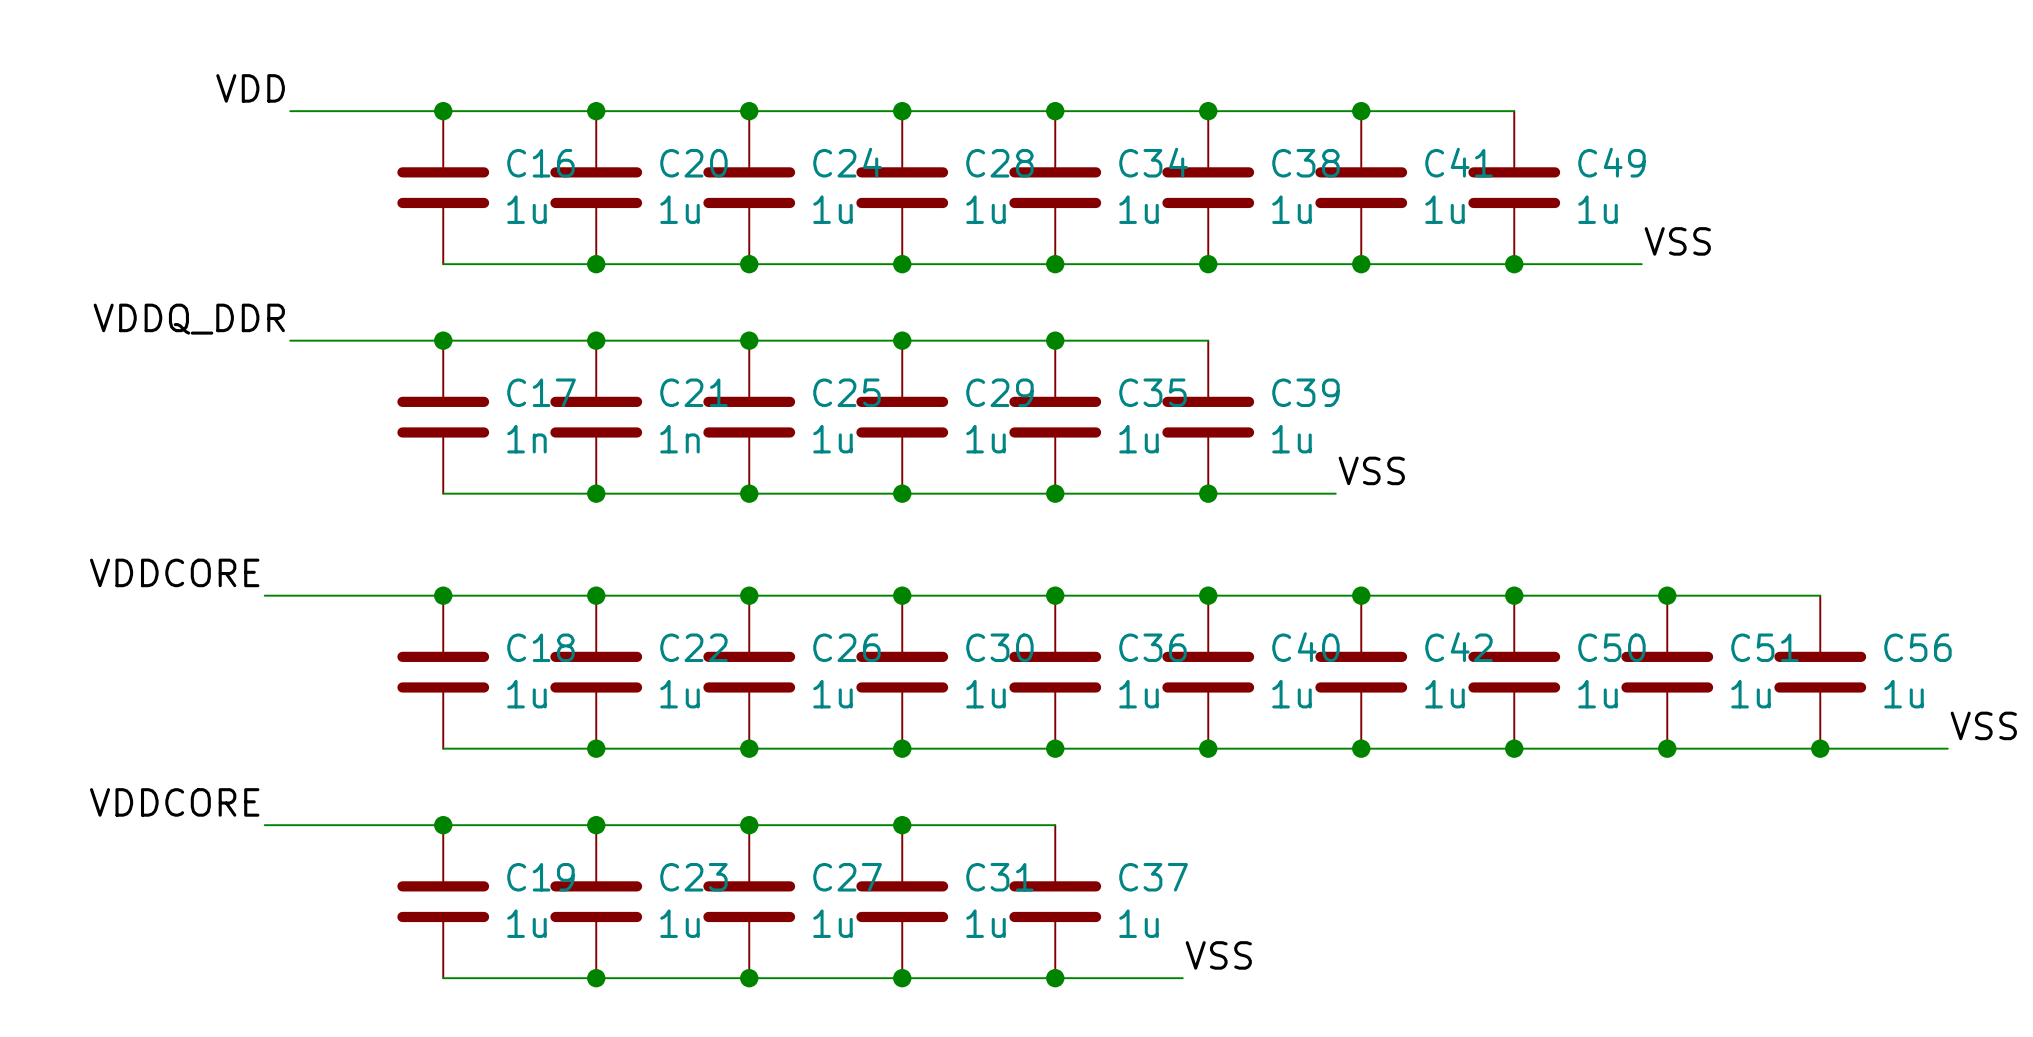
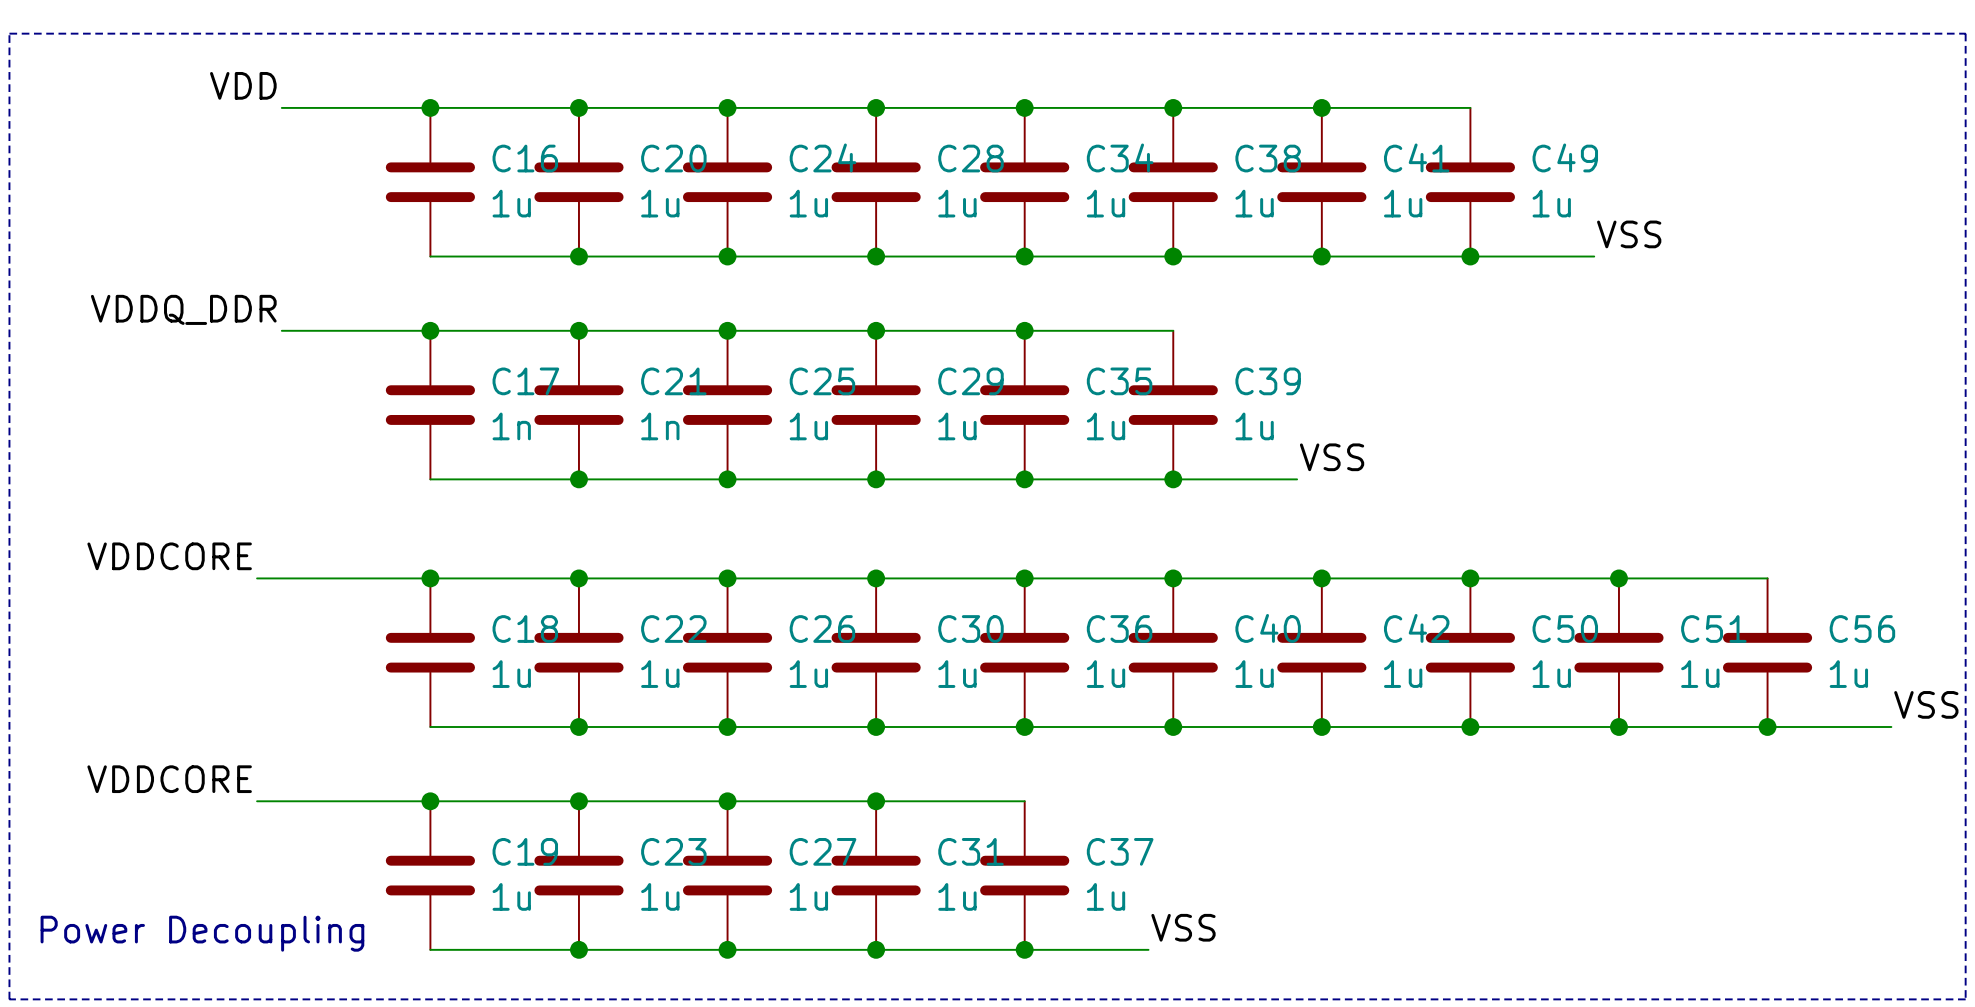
line: none -> (9, 33) (9, 999) (1965, 999) (1965, 33) (9, 33)
text: none -> Power Decoupling (202, 933)

